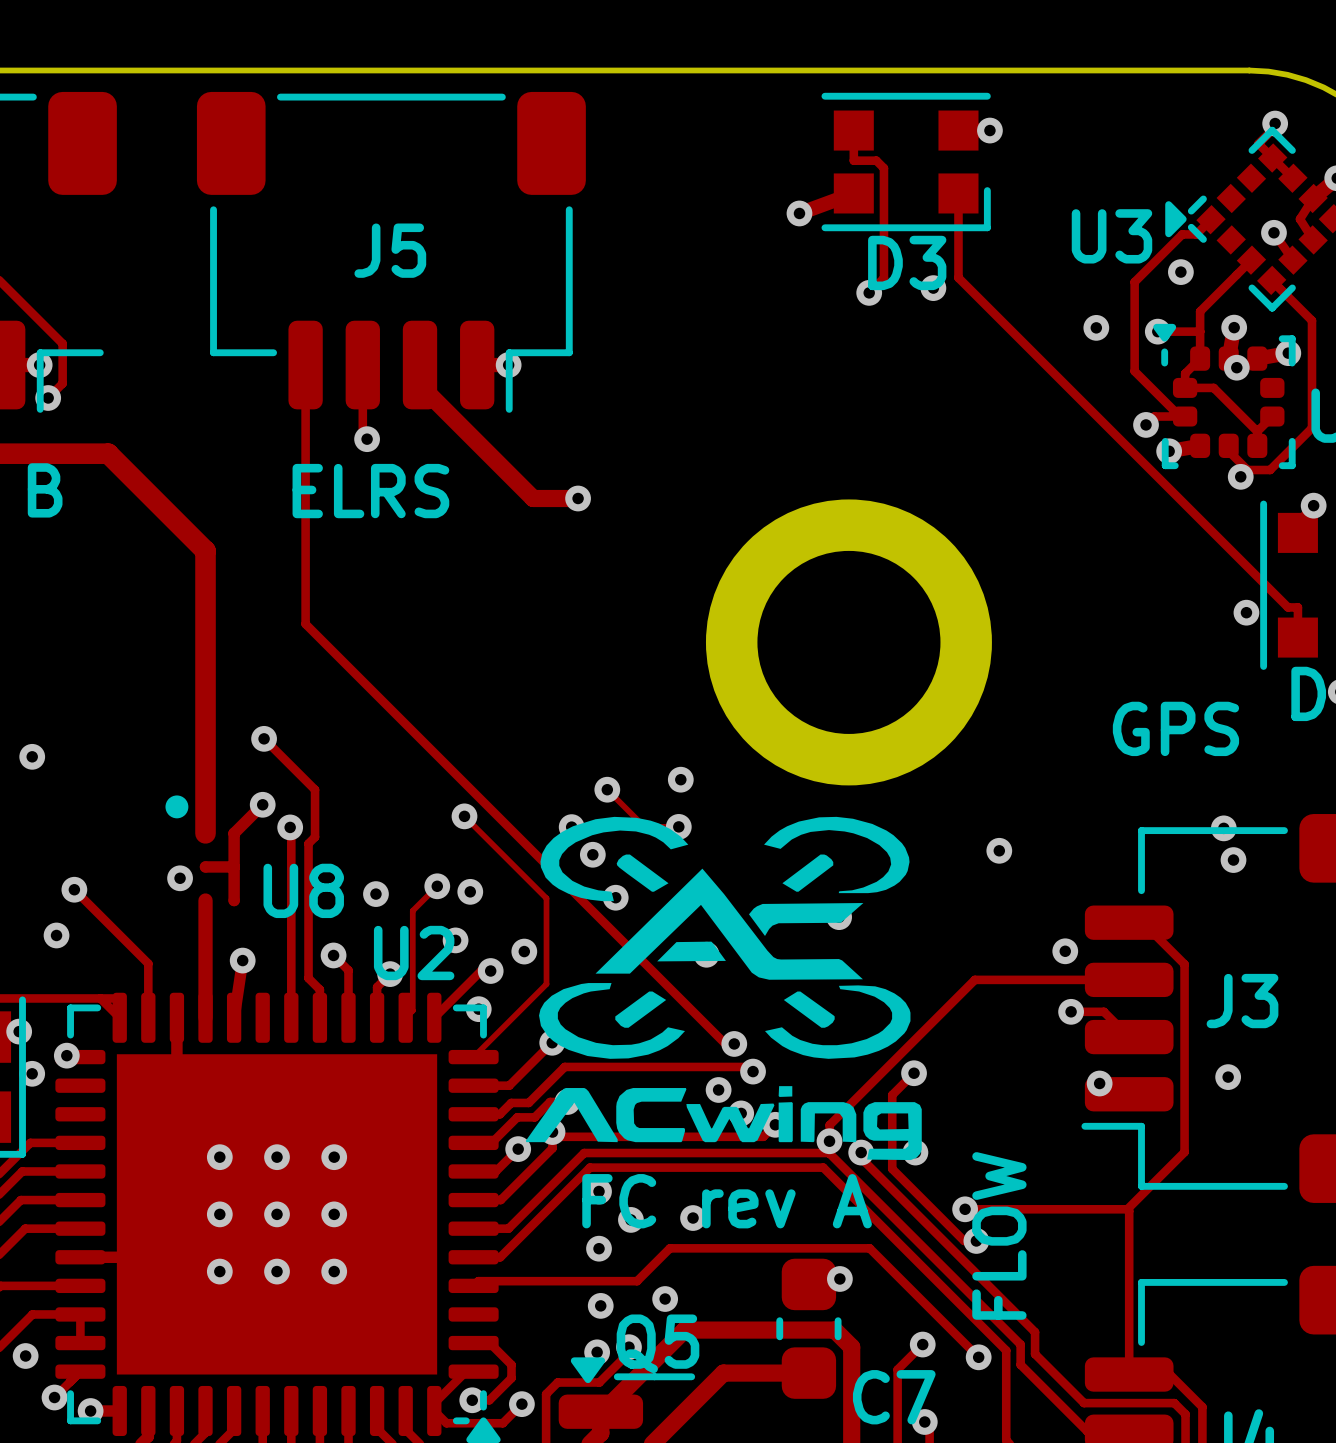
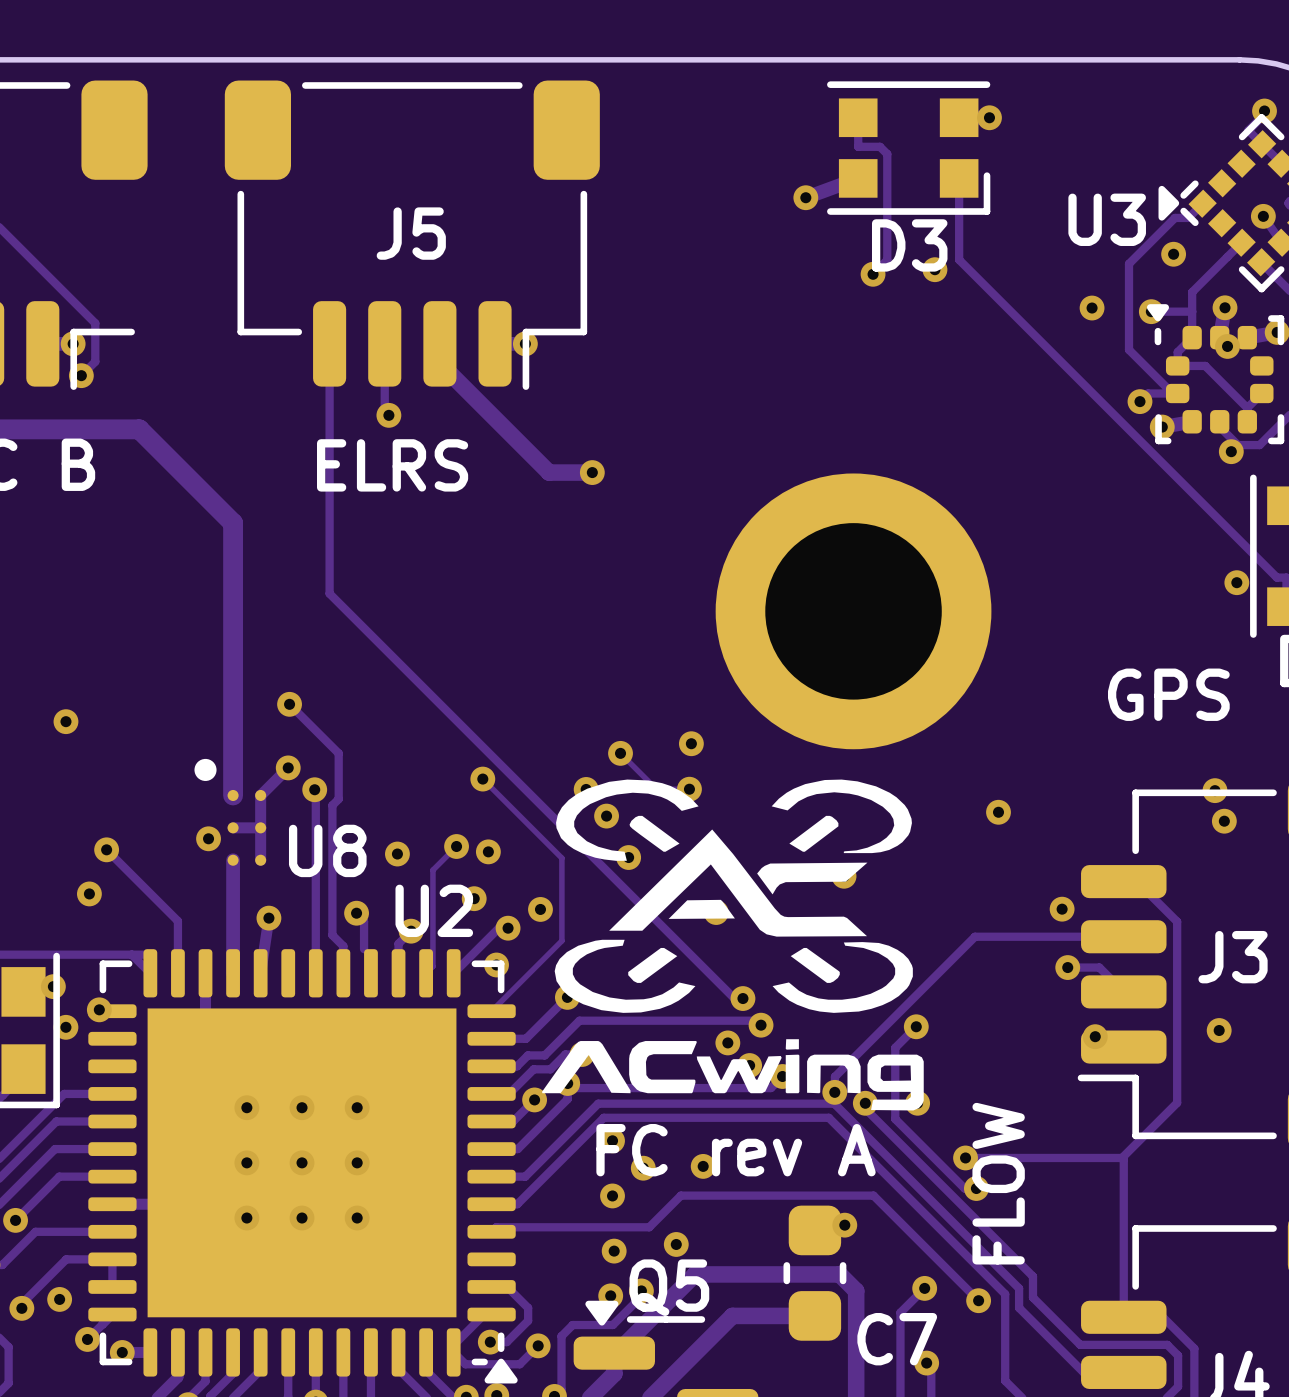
track: (333, 955) (348, 970) (348, 1017) -> none
track: none -> (358, 916) (364, 921) (364, 949)

